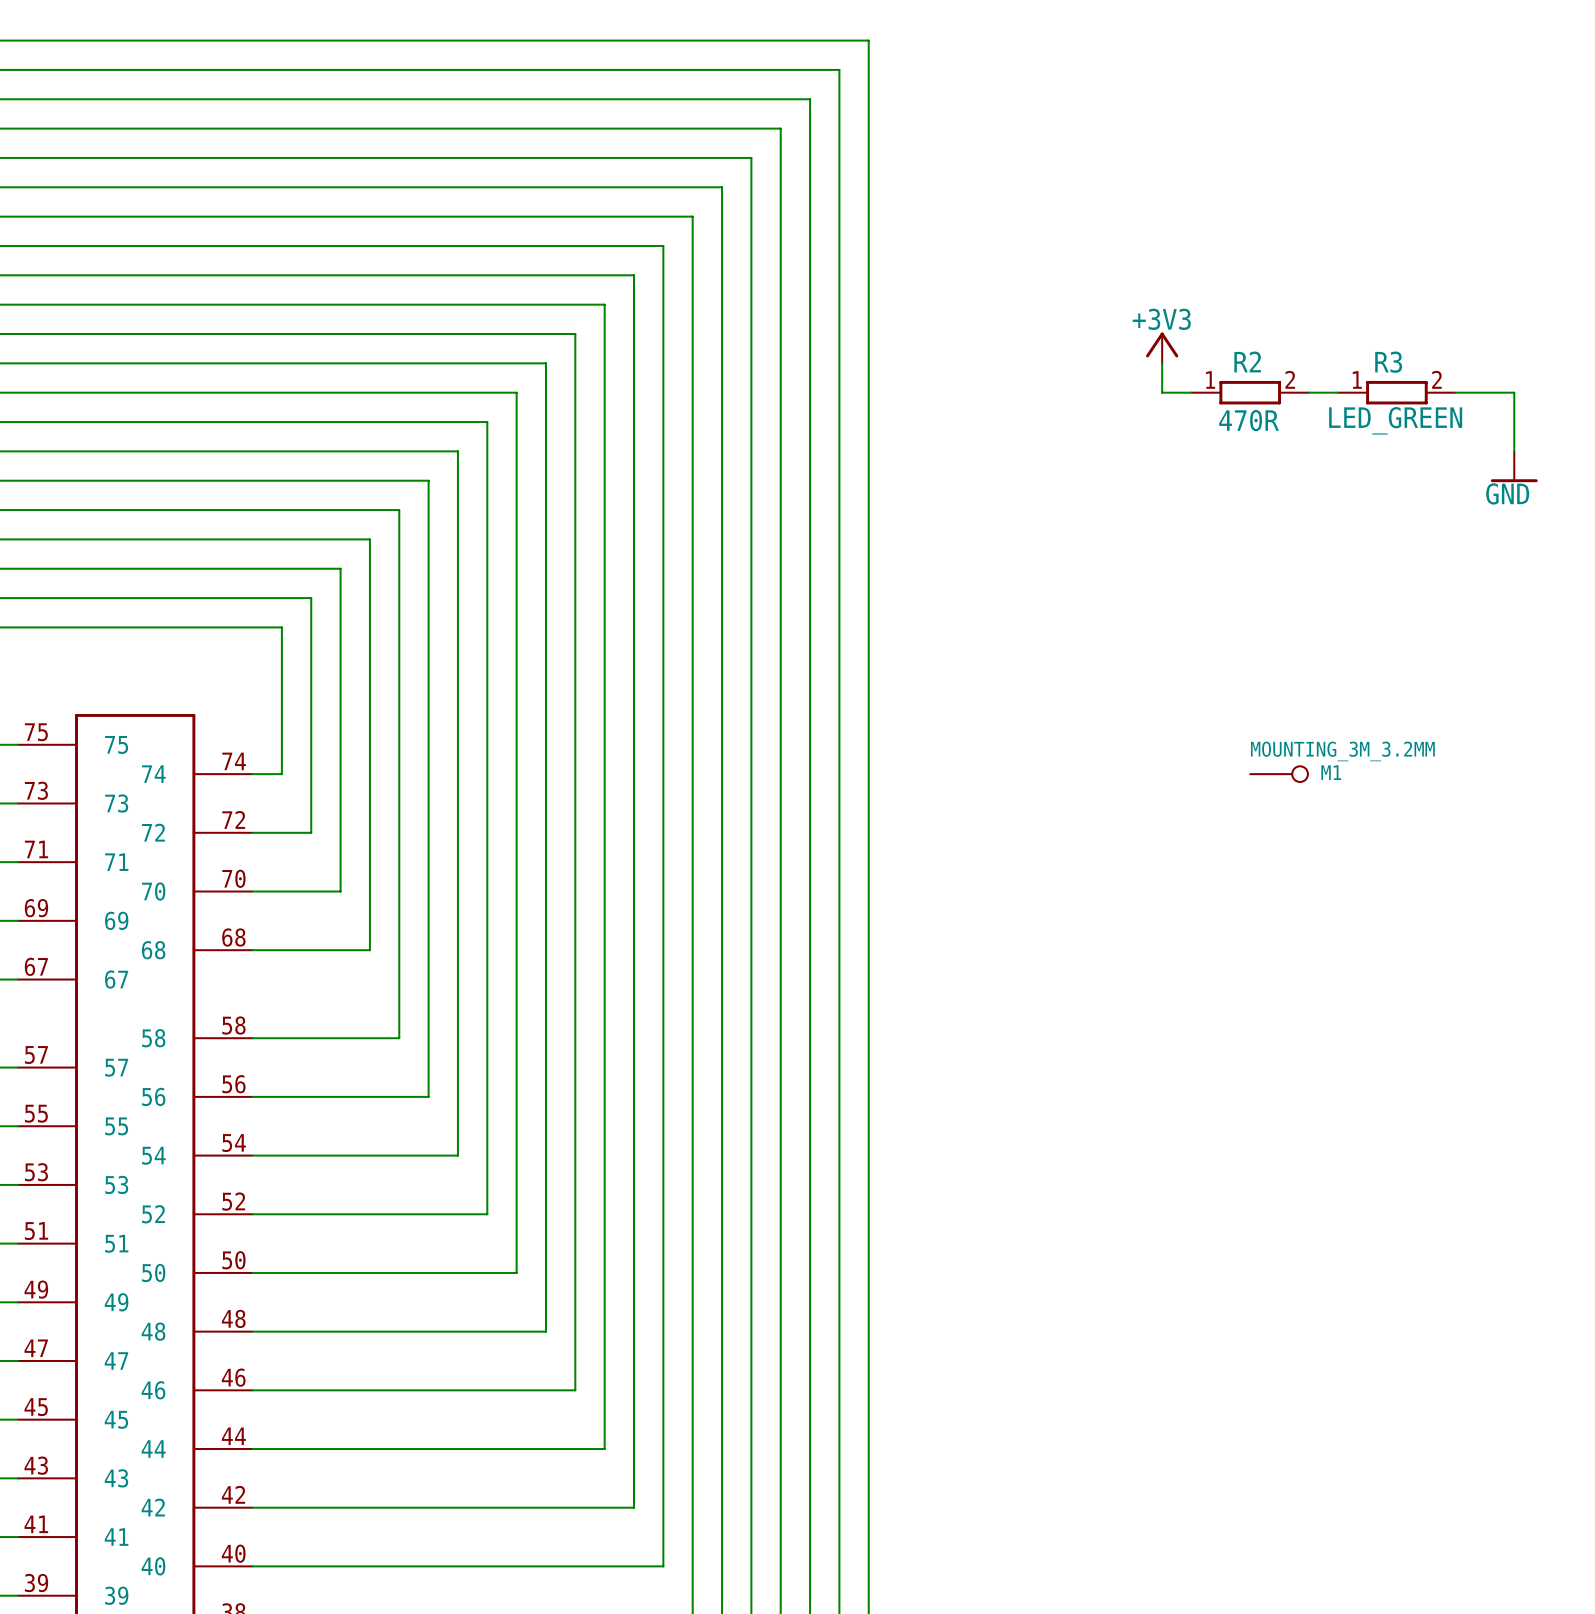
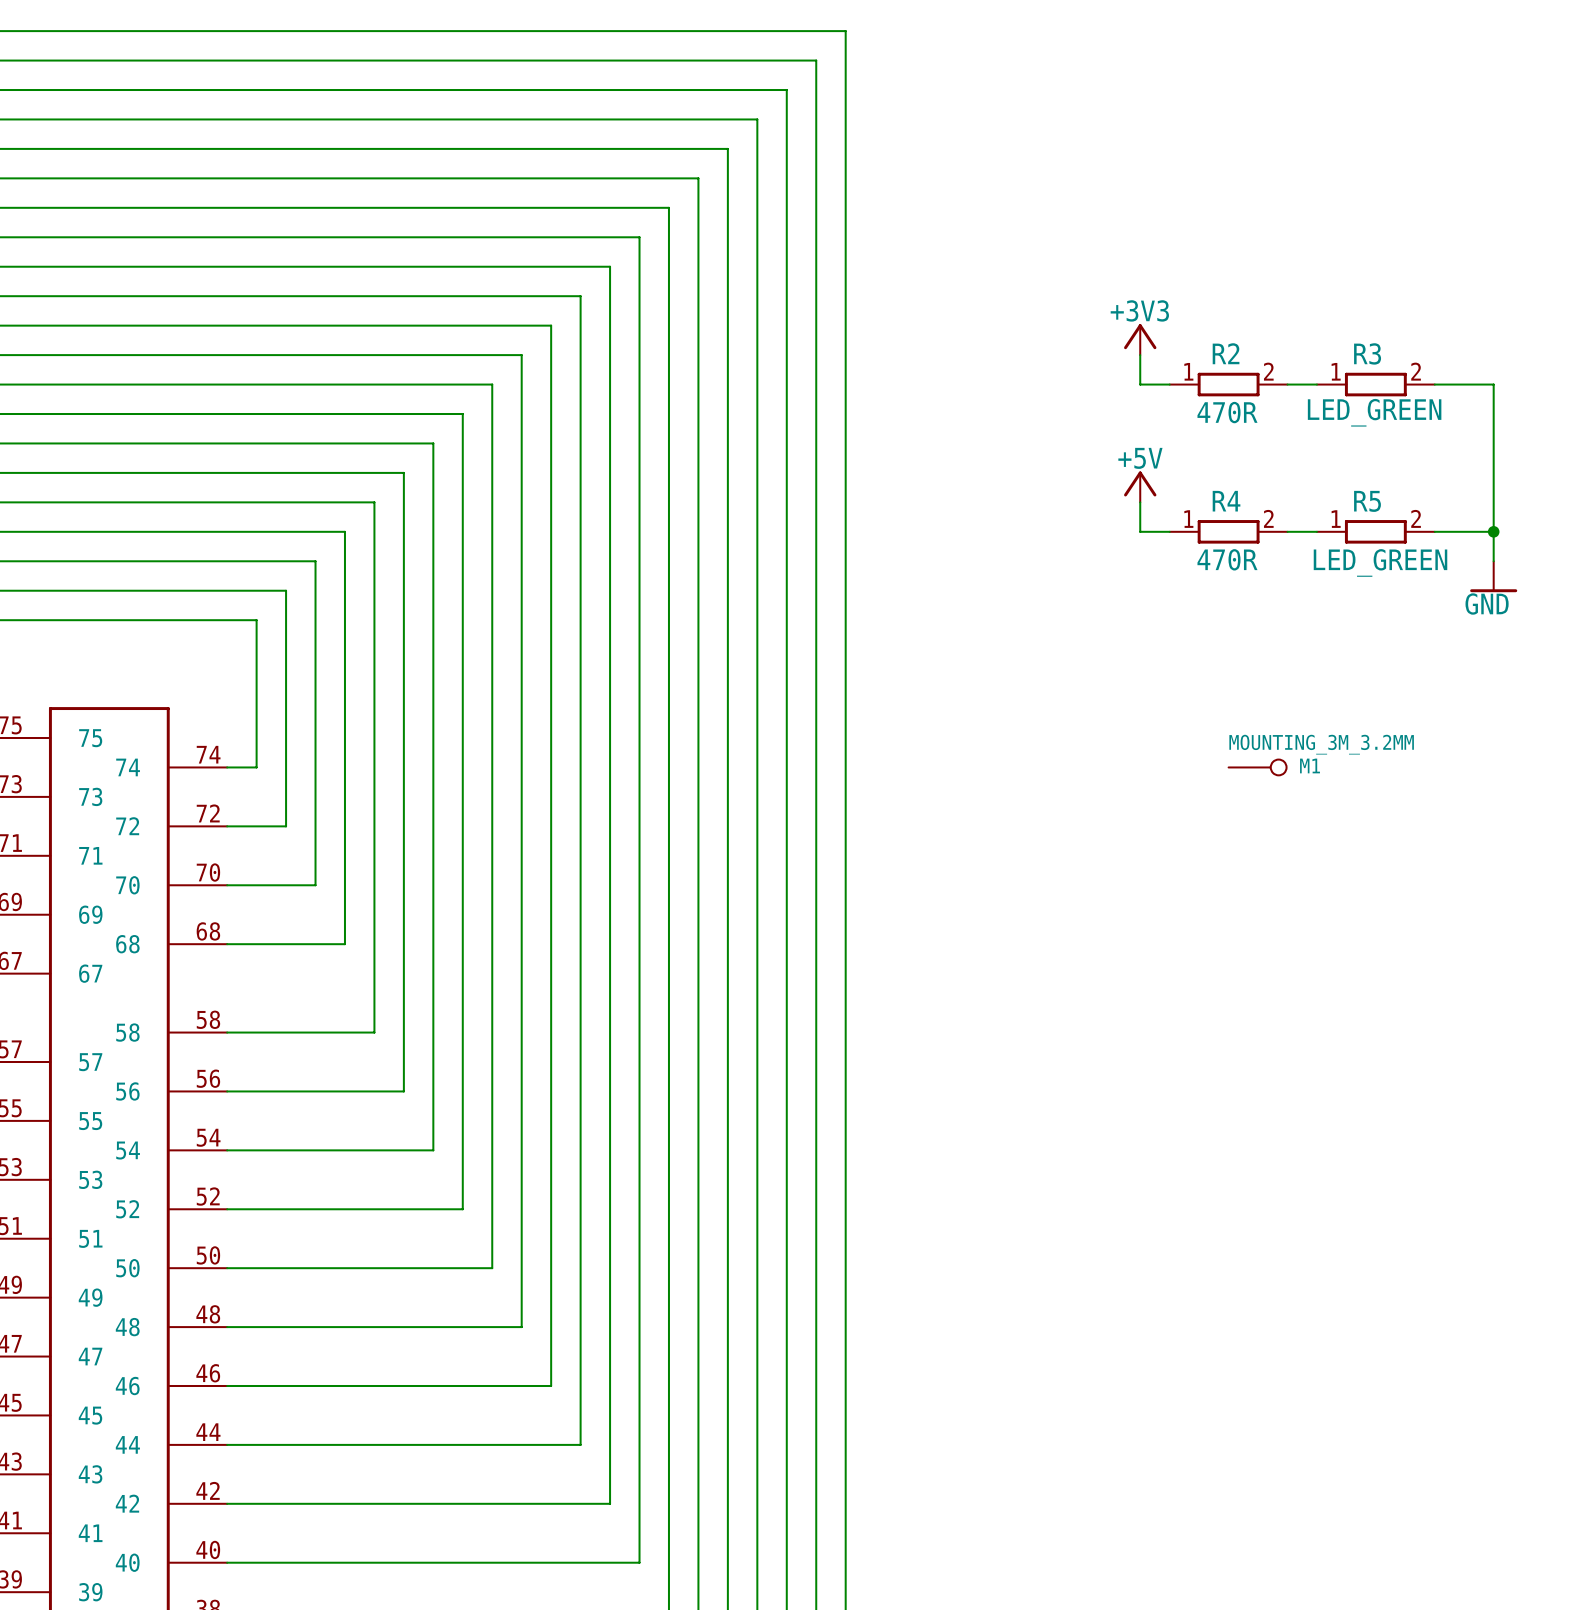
wire: none -> (1493, 443) (1493, 561)
power symbol position: GND (1514, 466) -> GND (1493, 576)
power symbol: none -> +5V (1140, 486)
wire: none -> (1140, 502) (1140, 531) (1169, 531)
R4: none -> 470R (1228, 531)
wire: none -> (1287, 531) (1316, 531)
R5: none -> LED_GREEN (1375, 531)
wire: none -> (1434, 531) (1493, 531)
junction: none -> (1493, 531)

